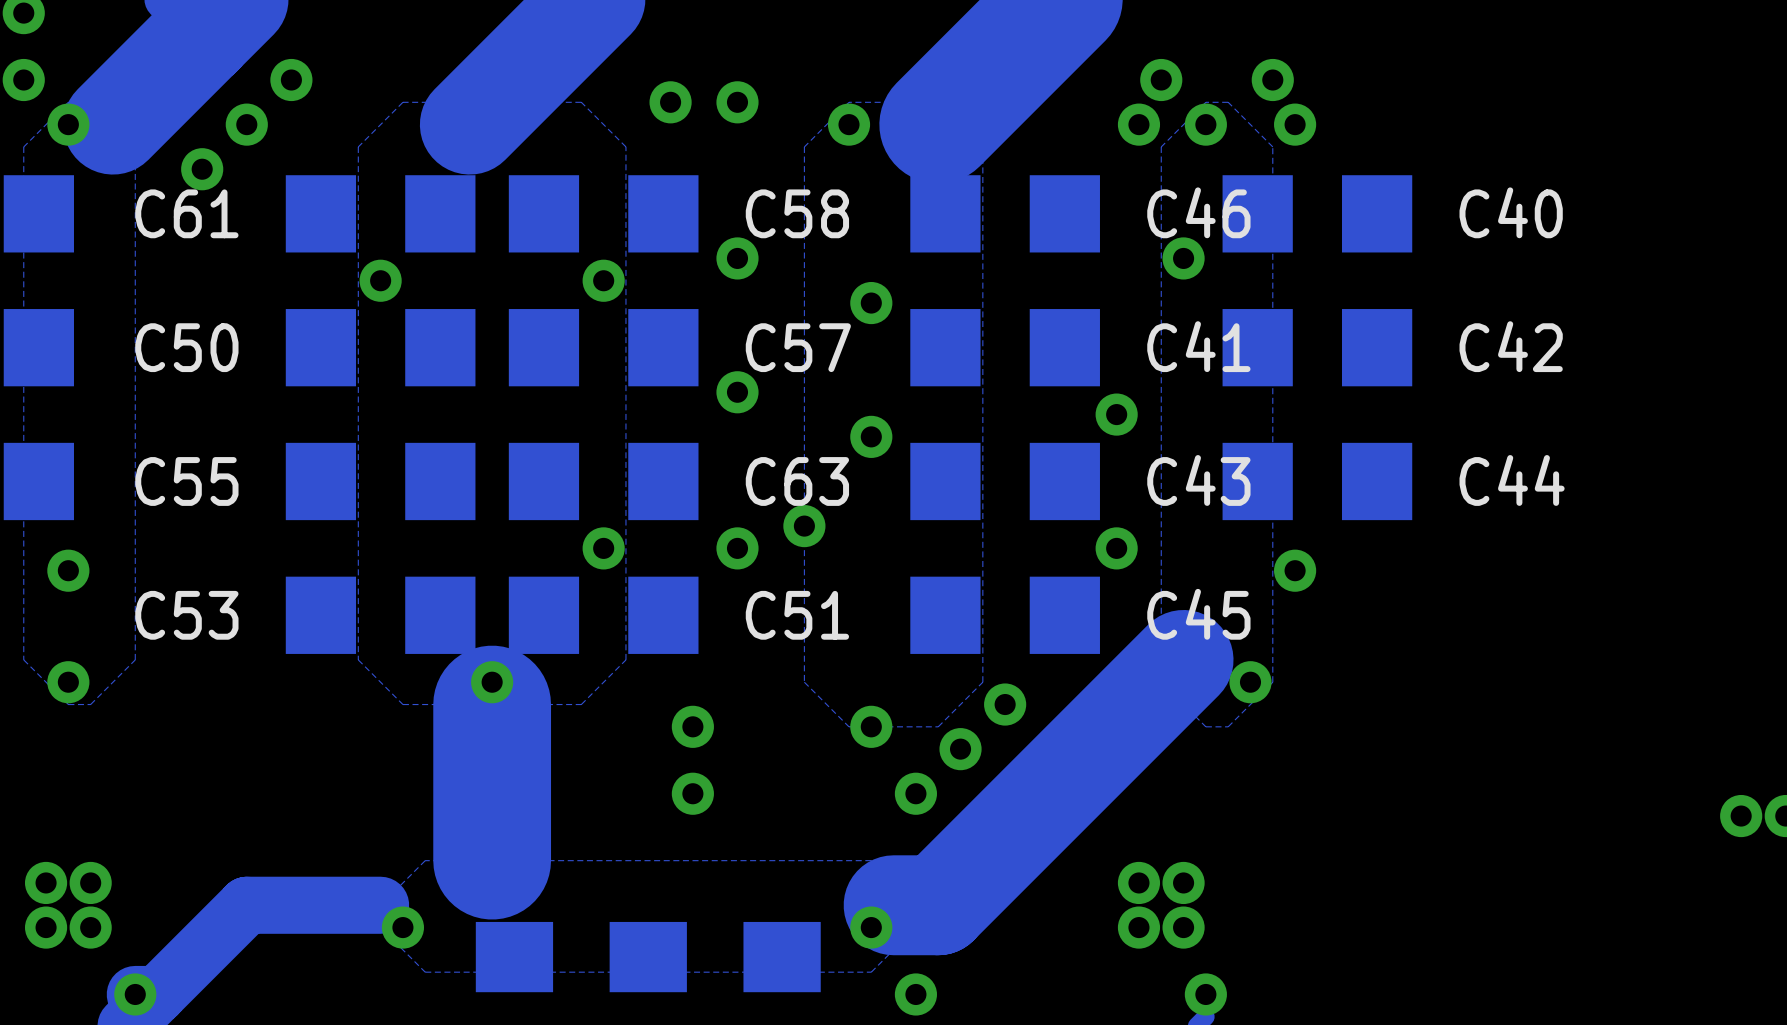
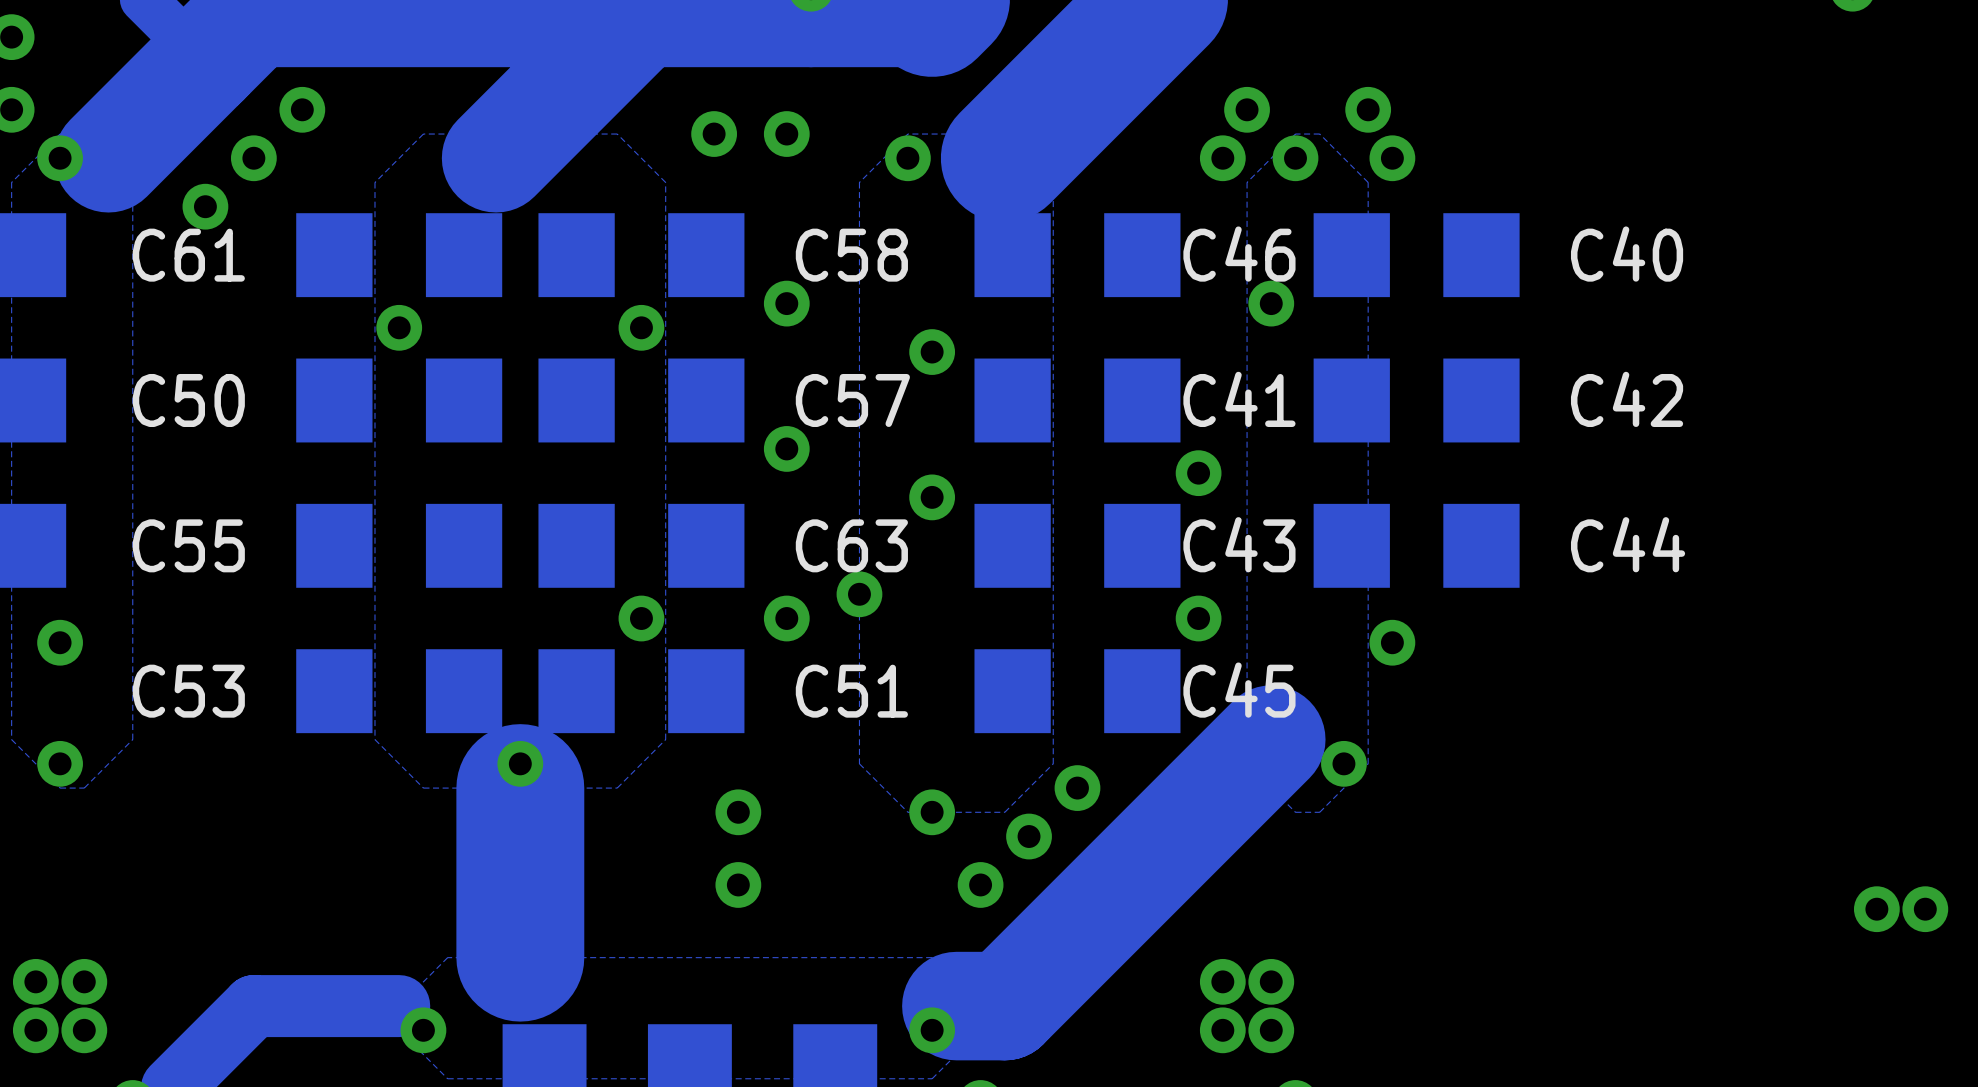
C46 name position: C46 (1198, 212) -> C46 (1239, 254)
C41 name position: C41 (1198, 346) -> C41 (1239, 399)
C43 name position: C43 (1198, 480) -> C43 (1239, 544)
C45 name position: C45 (1198, 614) -> C45 (1239, 690)

